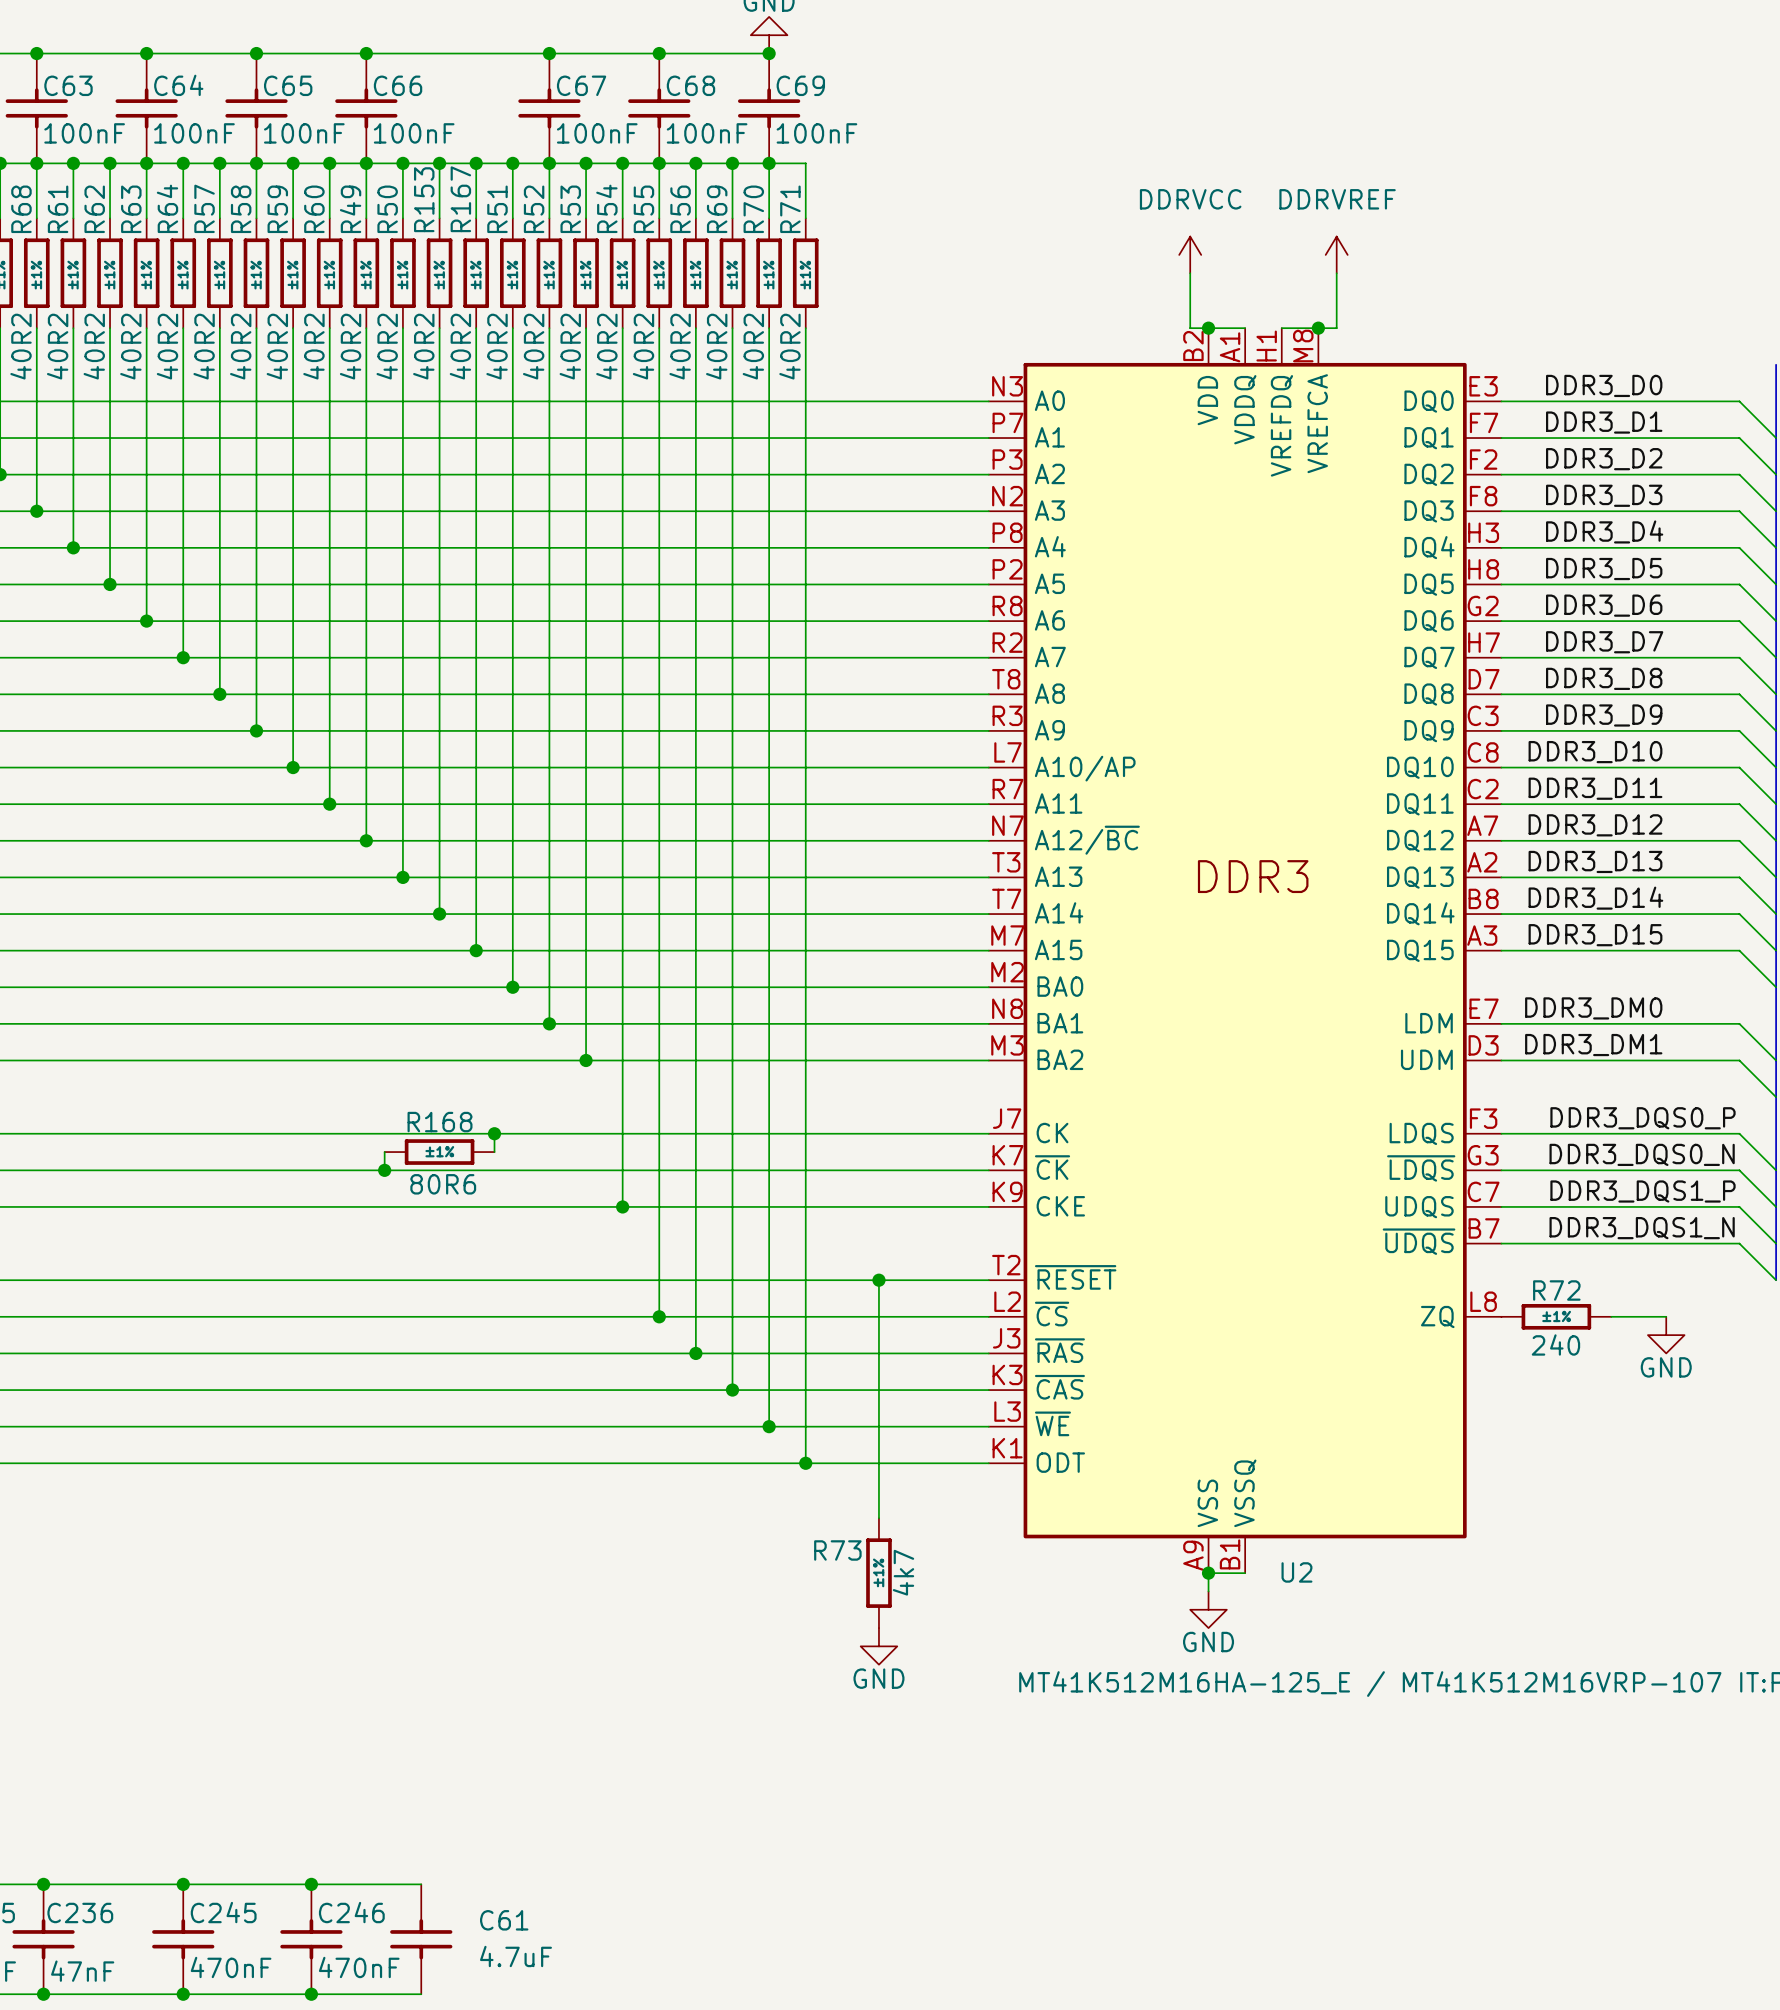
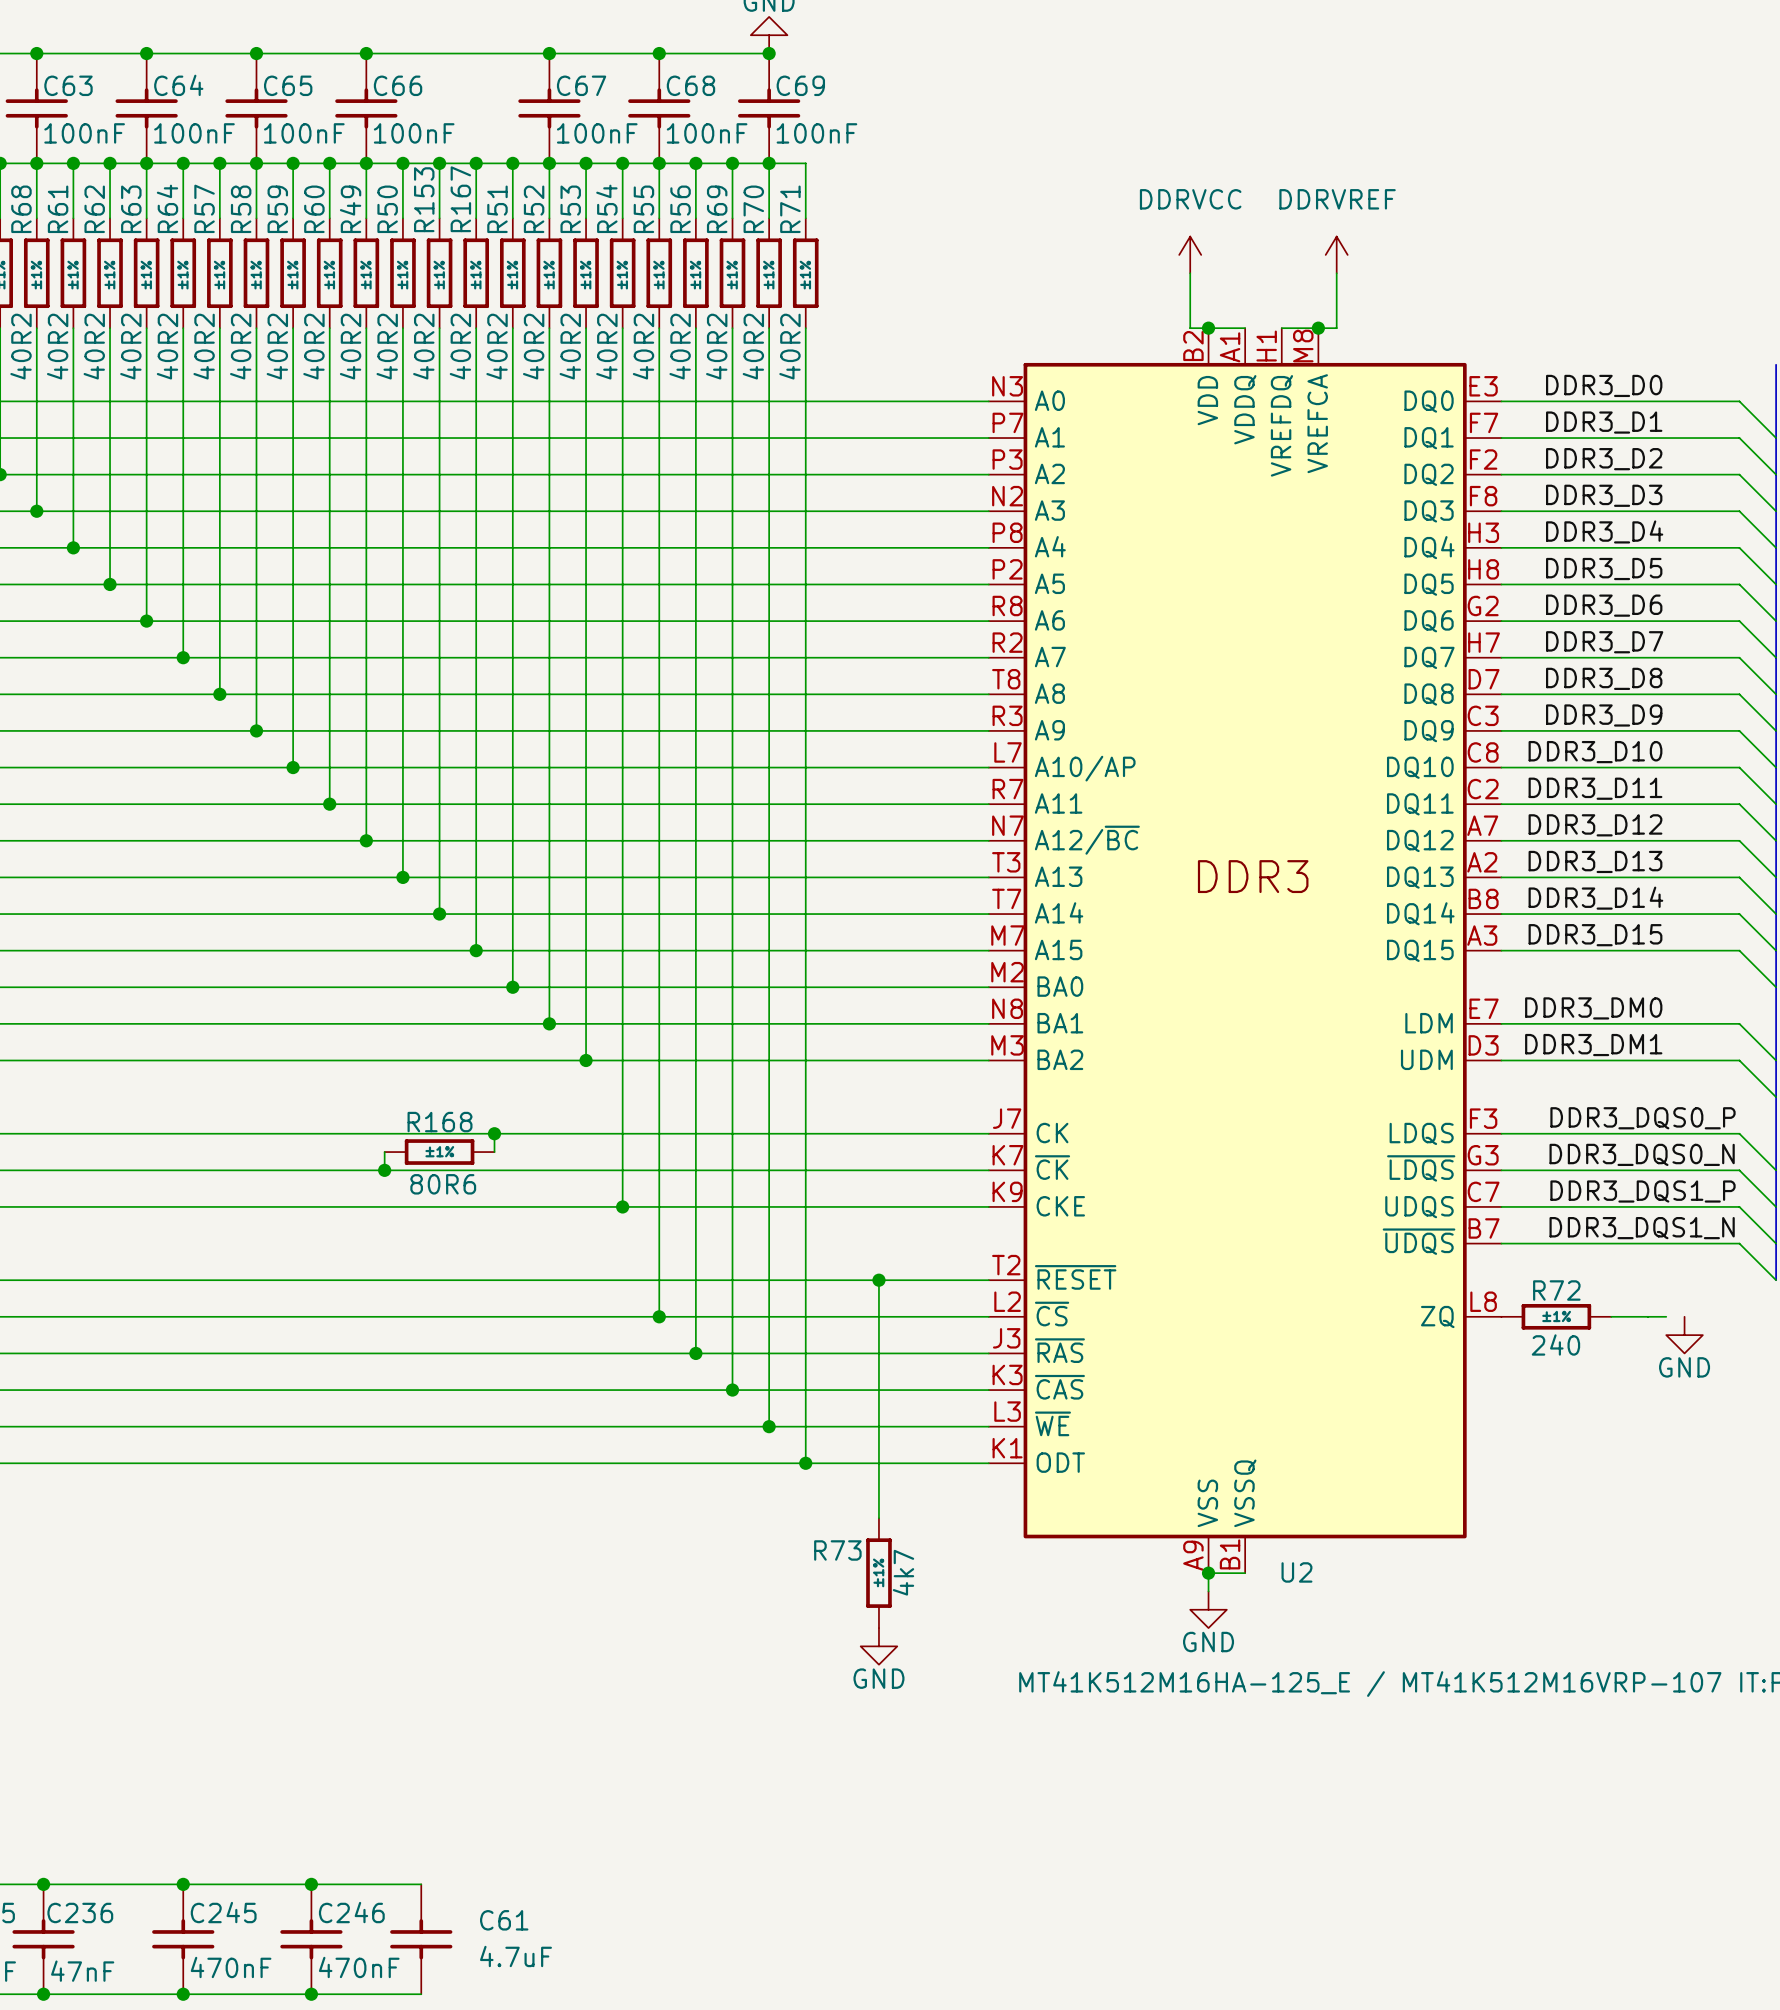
power symbol position: GND (1666, 1335) -> GND (1684, 1335)

